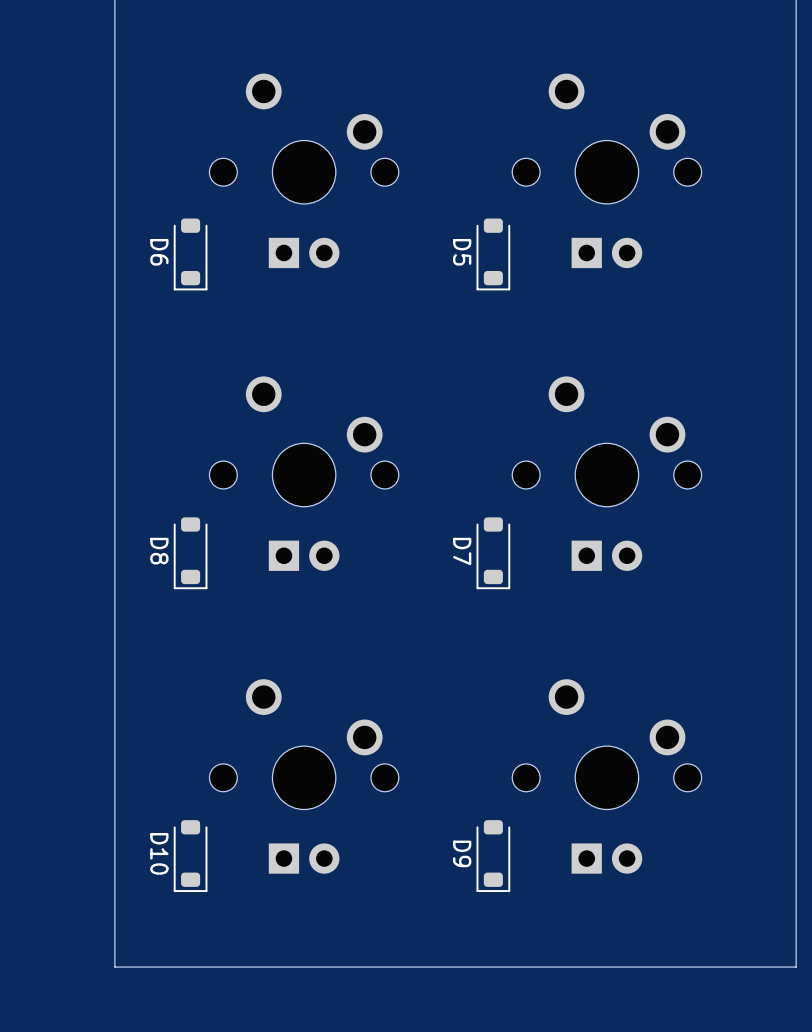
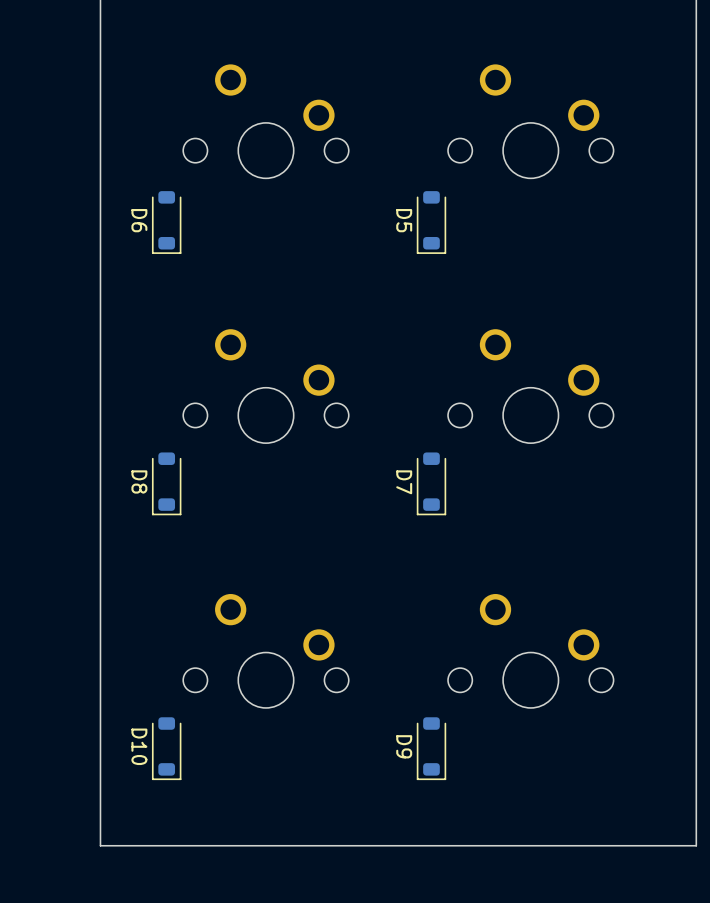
part: (304, 170) -> none
part: (606, 170) -> none
part: (304, 473) -> none
part: (606, 473) -> none
part: (304, 776) -> none
part: (606, 776) -> none

